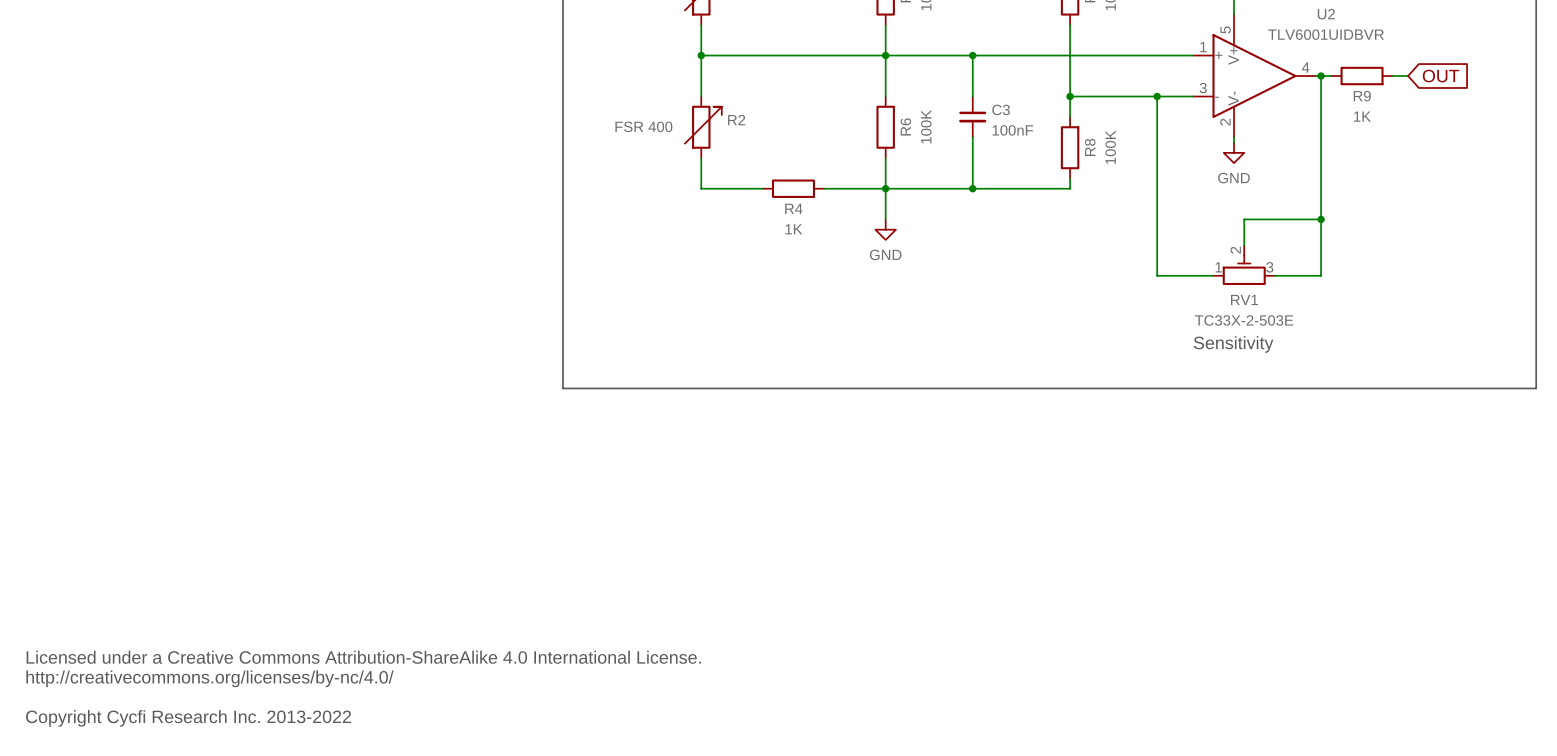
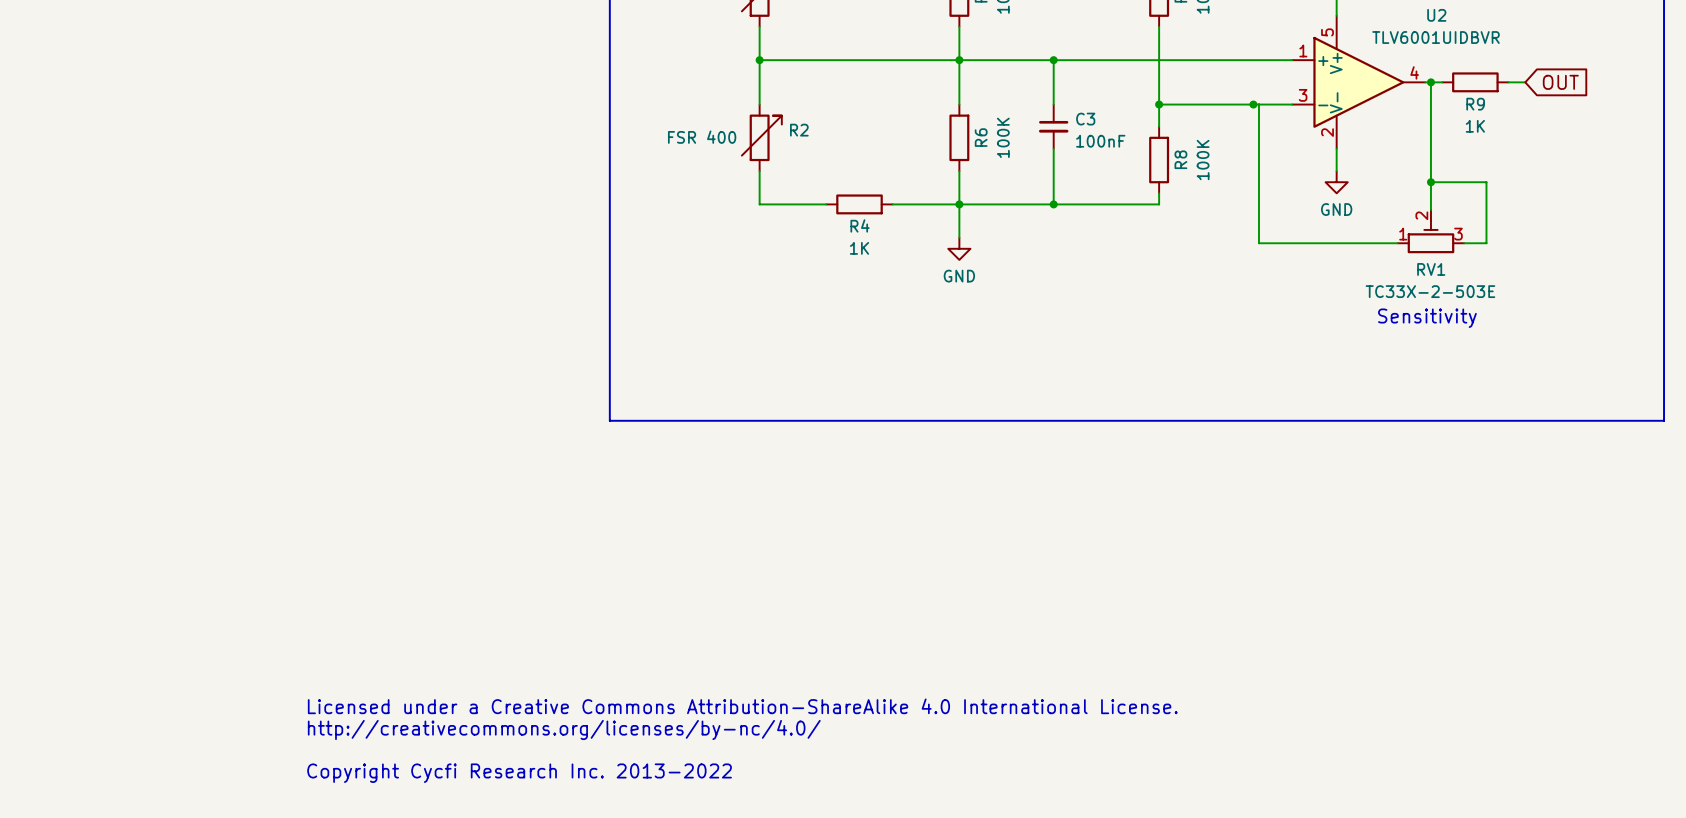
wire: (1157, 96) (1157, 275) (1213, 275) -> none
wire: none -> (1258, 104) (1258, 243) (1397, 243)
power symbol position: GND (1233, 152) -> GND (1336, 182)
wire: none -> (1430, 182) (1486, 182) (1486, 243) (1464, 243)
junction: none -> (1430, 182)
wire: (1321, 193) (1321, 275) (1274, 275) -> none
wire: (1321, 219) (1244, 219) (1244, 245) -> none
junction: (1321, 219) -> none
RV1 position: (1244, 265) -> (1430, 231)
text position: Sensitivity (1233, 344) -> Sensitivity (1427, 318)
text: none -> Licensed under a Creative Commons Attribution-ShareAlike 4.0 International License. (742, 706)
text: Licensed under a Creative Commons Attribution-ShareAlike 4.0 International License. (363, 657) -> none
text: none -> http://creativecommons.org/licenses/by-nc/4.0/ (564, 729)
text: http://creativecommons.org/licenses/by-nc/4.0/ (210, 678) -> none
text: none -> Copyright Cycfi Research Inc. 2013-2022 (519, 773)
text: Copyright Cycfi Research Inc. 2013-2022 (188, 718) -> none

